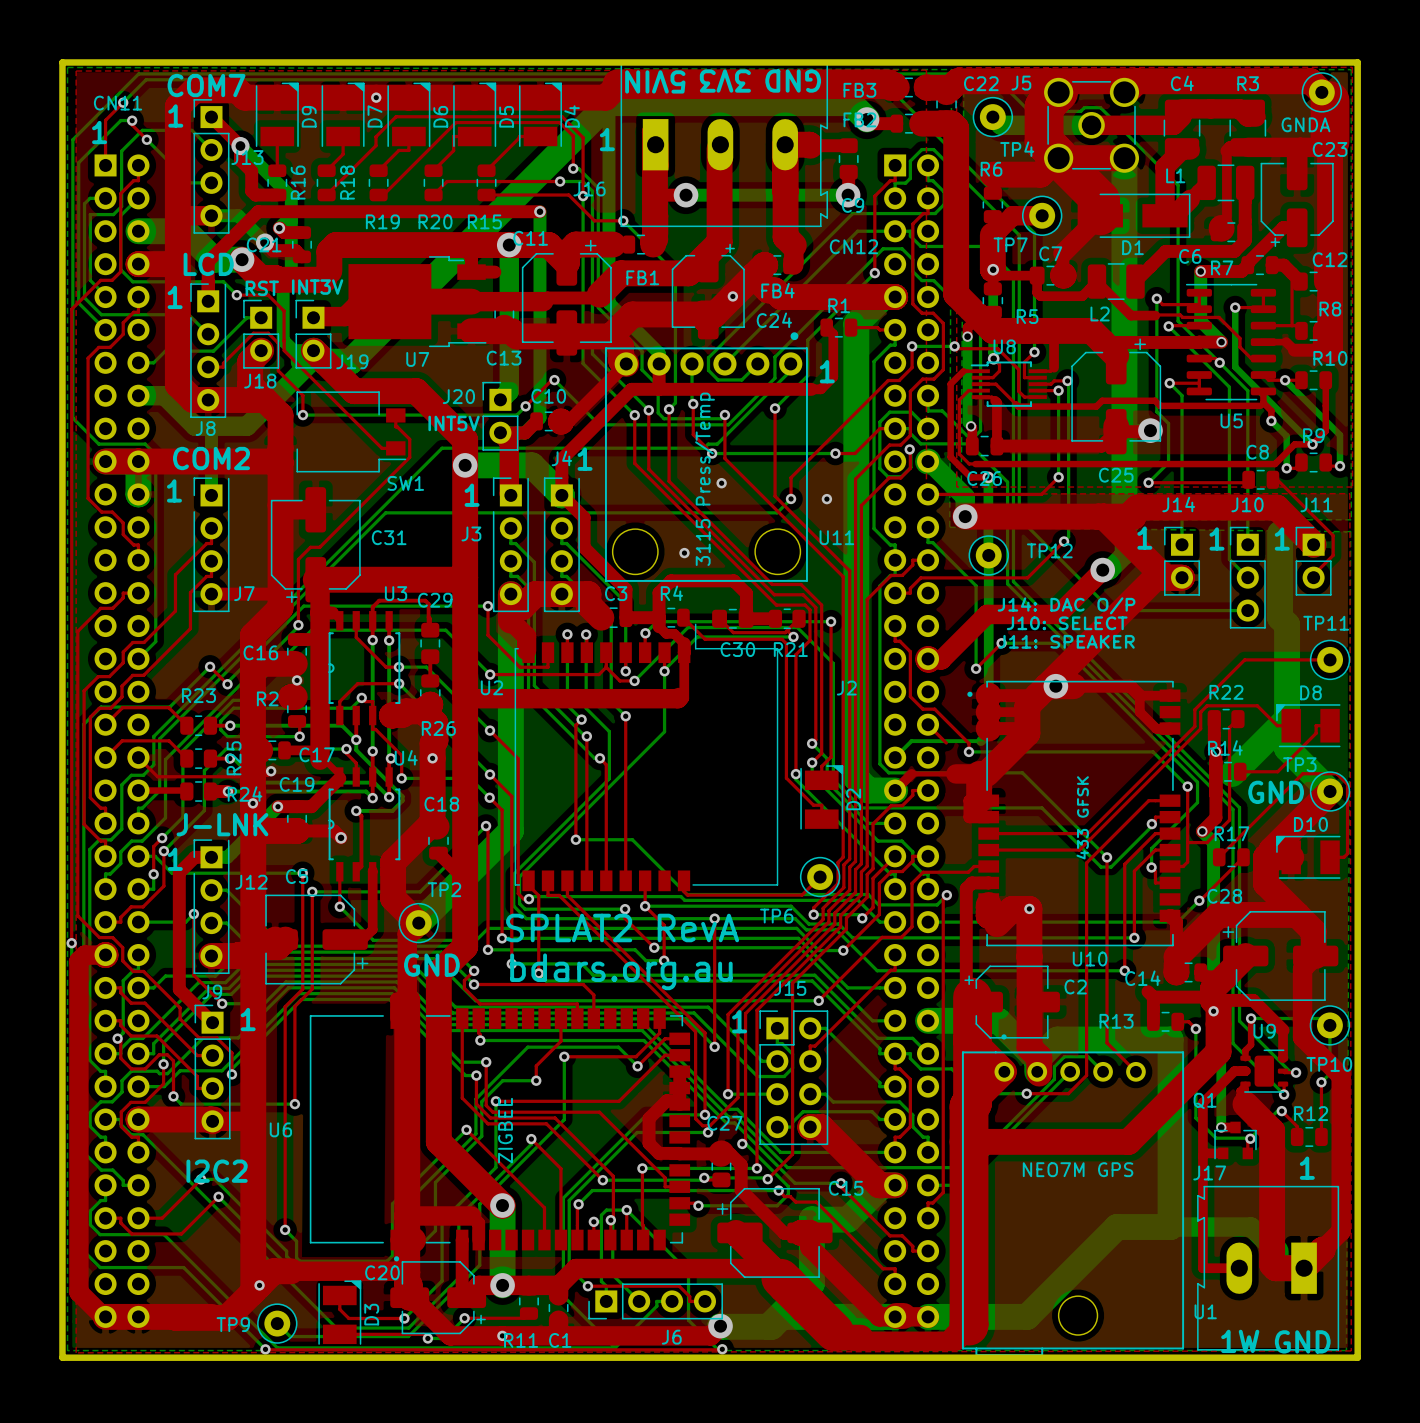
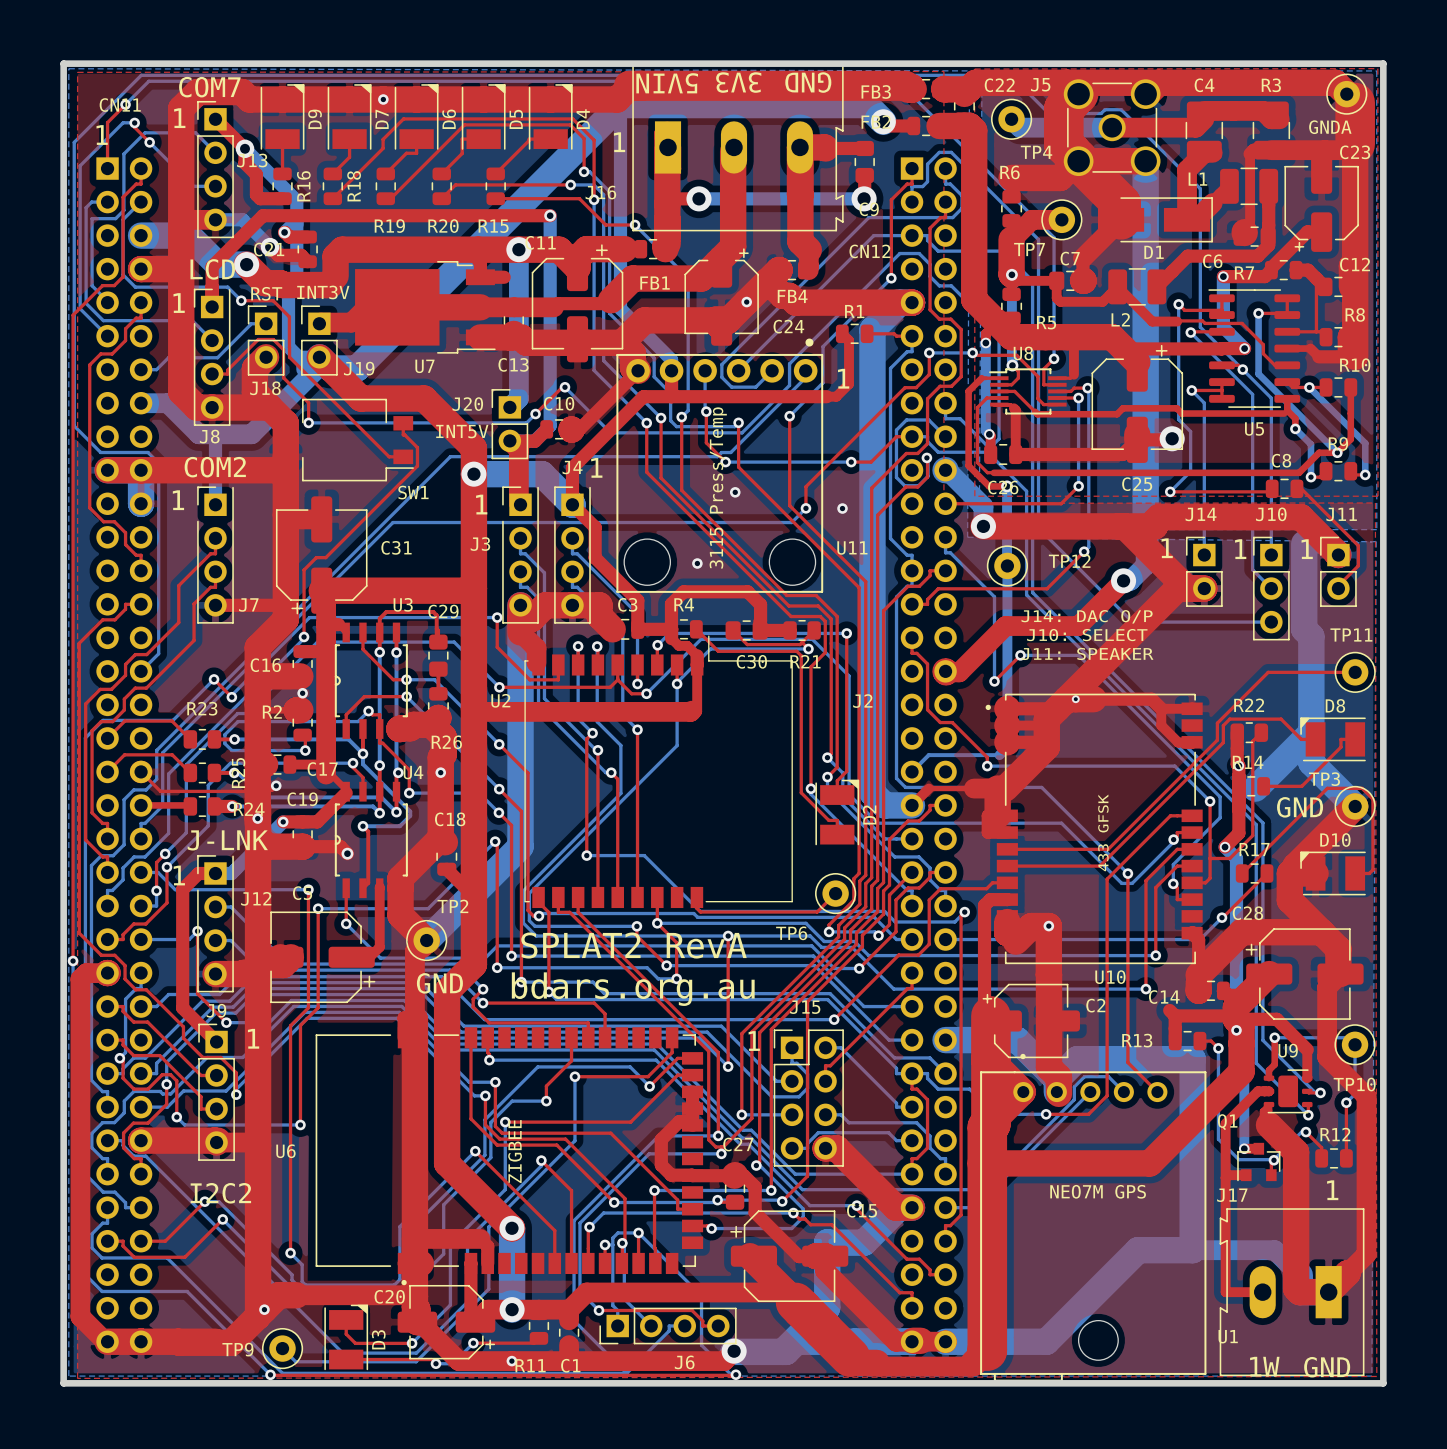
via size: [1043, 673, 1069, 699] -> [1071, 695, 1080, 704]
top track: (928, 724) (946, 743) -> none

